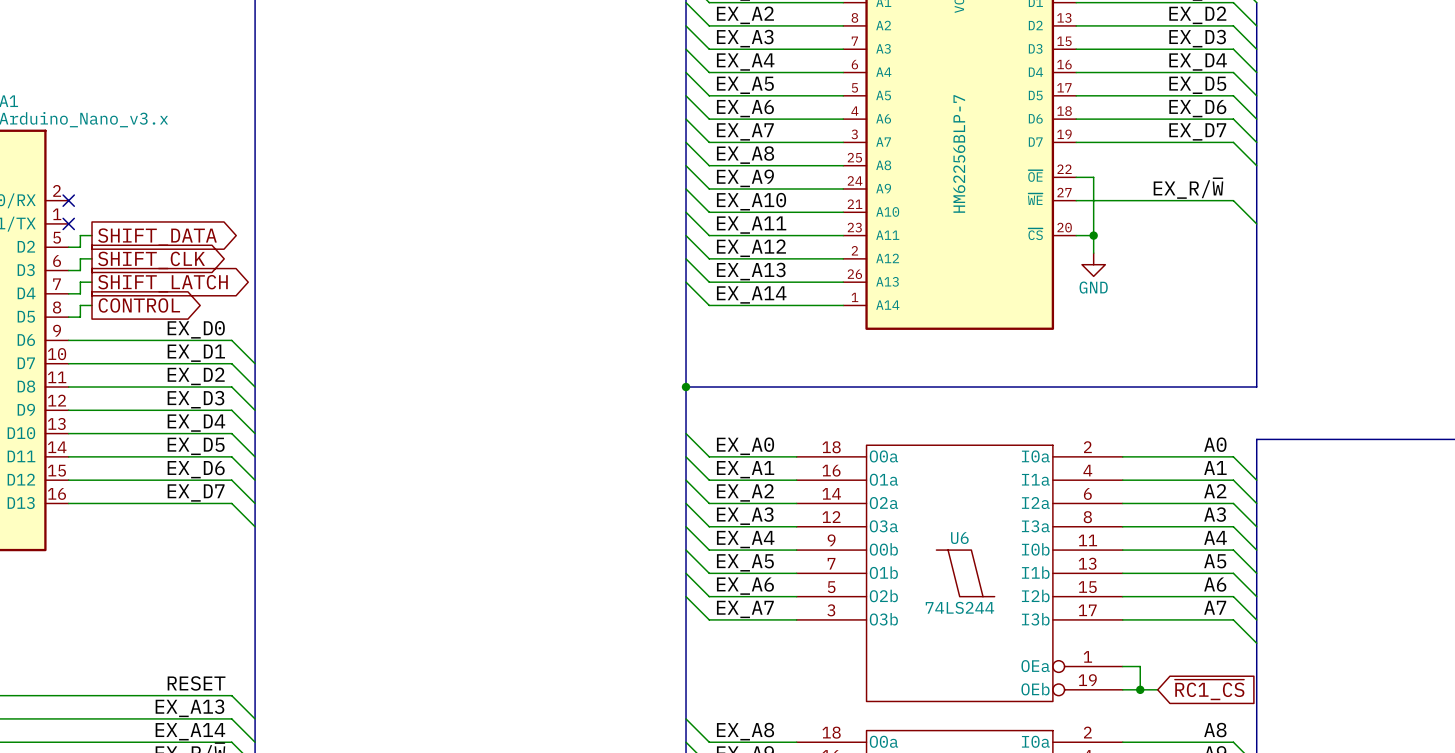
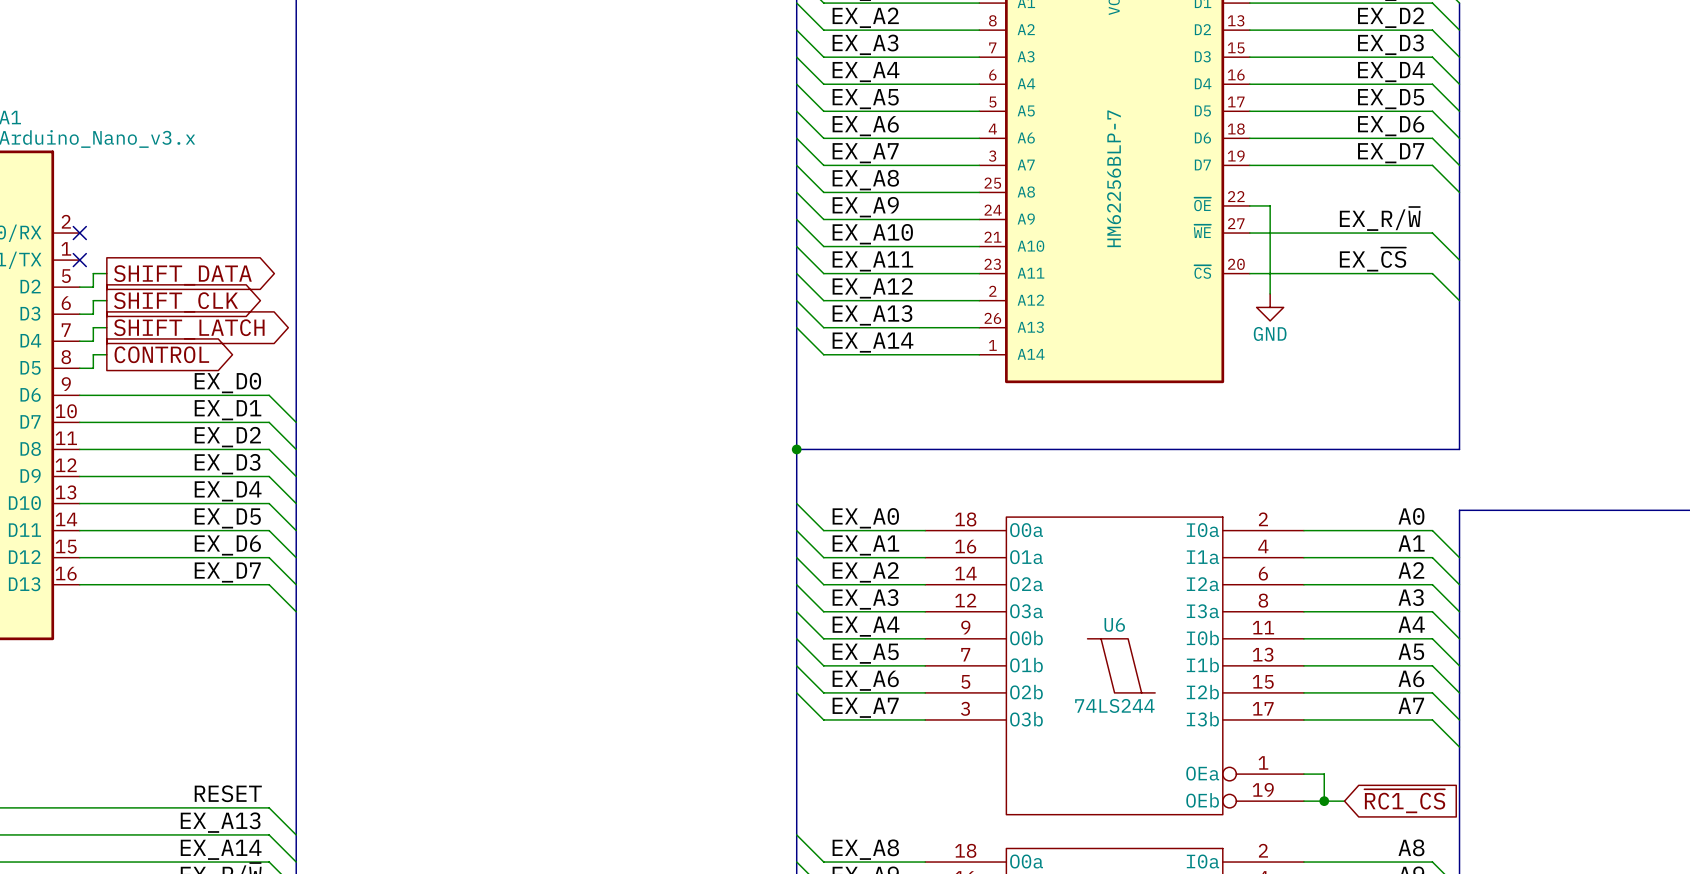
label: none -> EX_~{CS} (1373, 259)
wire: none -> (1270, 273) (1432, 273) (1459, 300)
junction: (1093, 235) -> none

